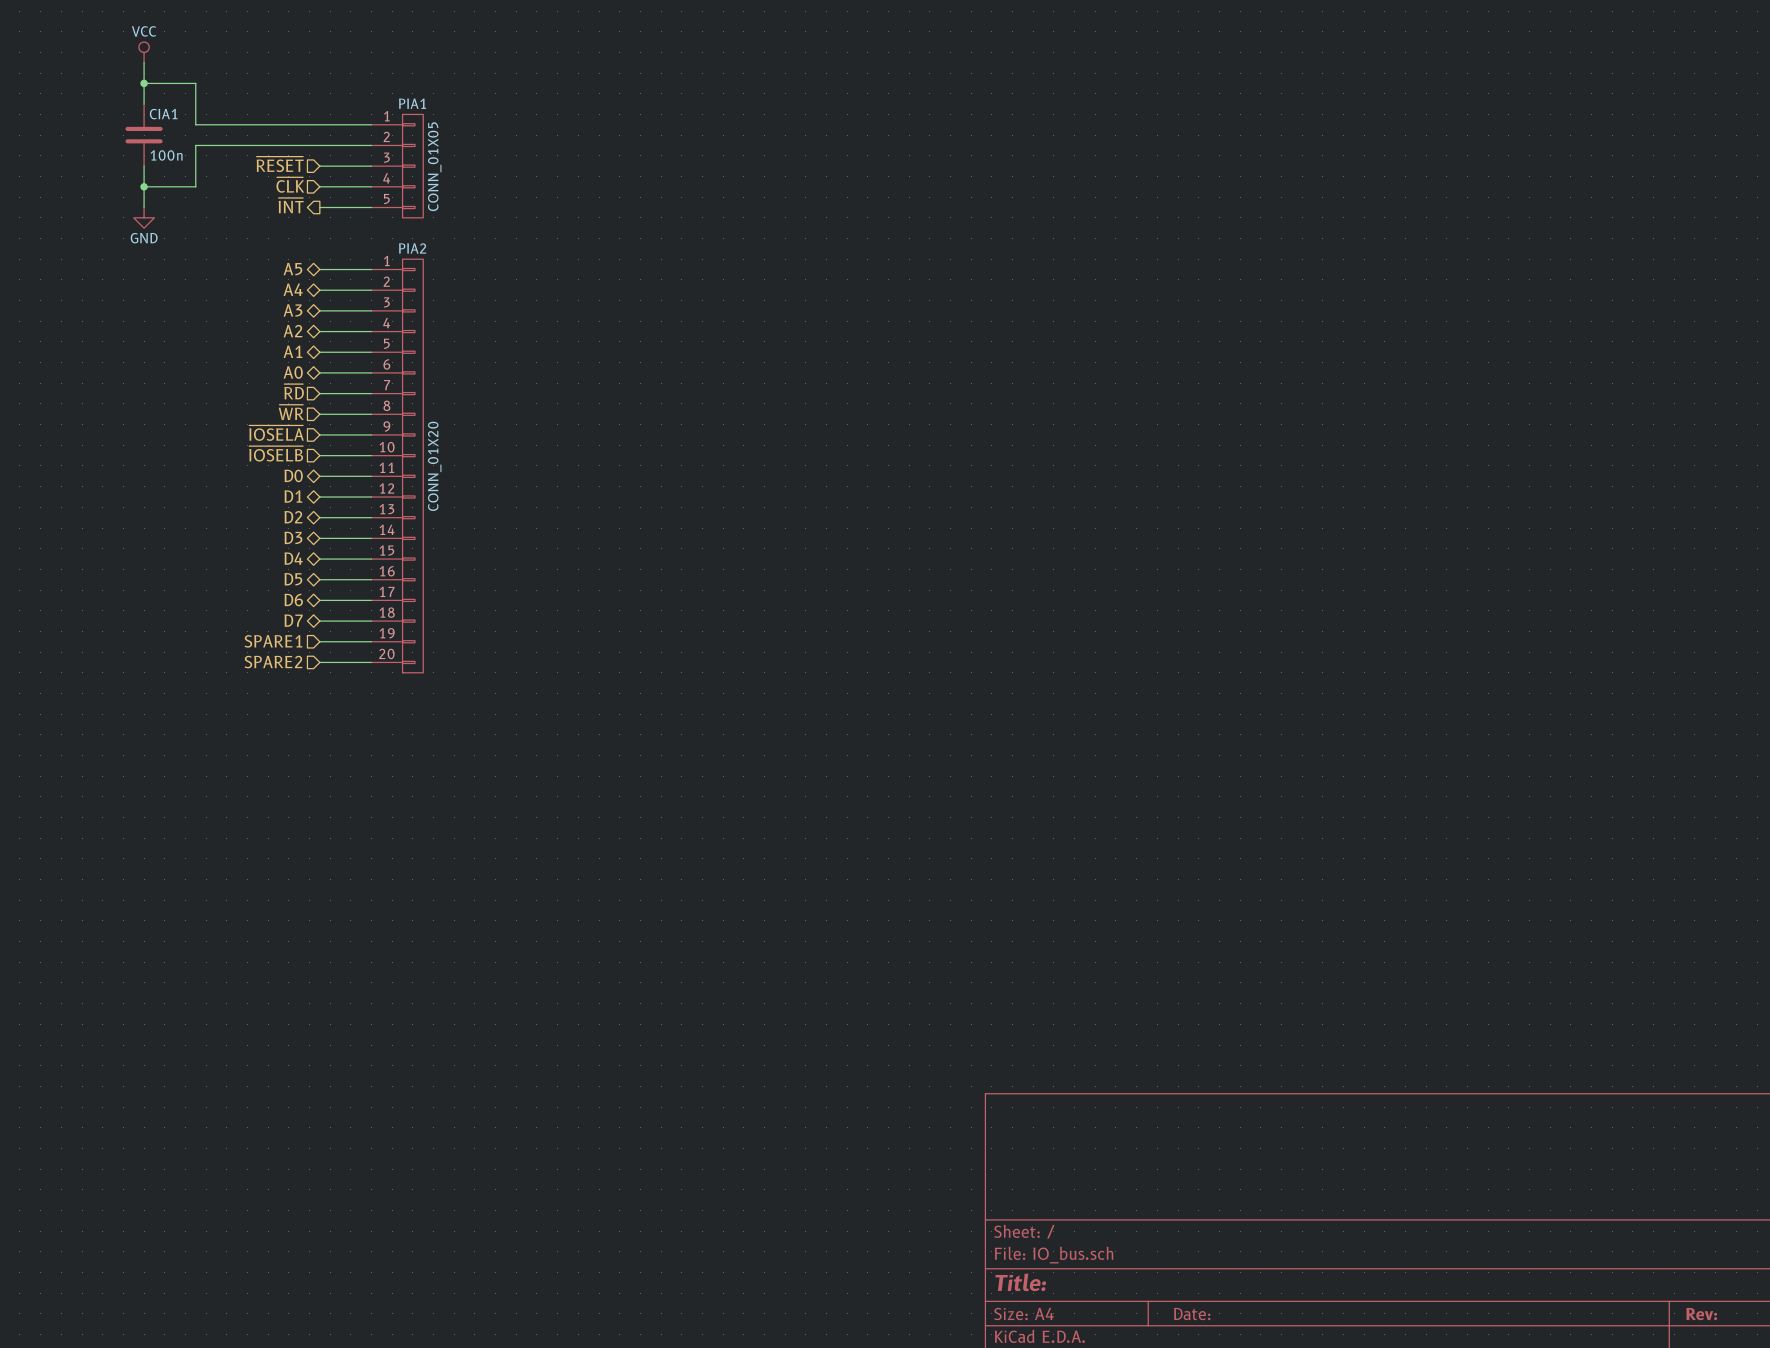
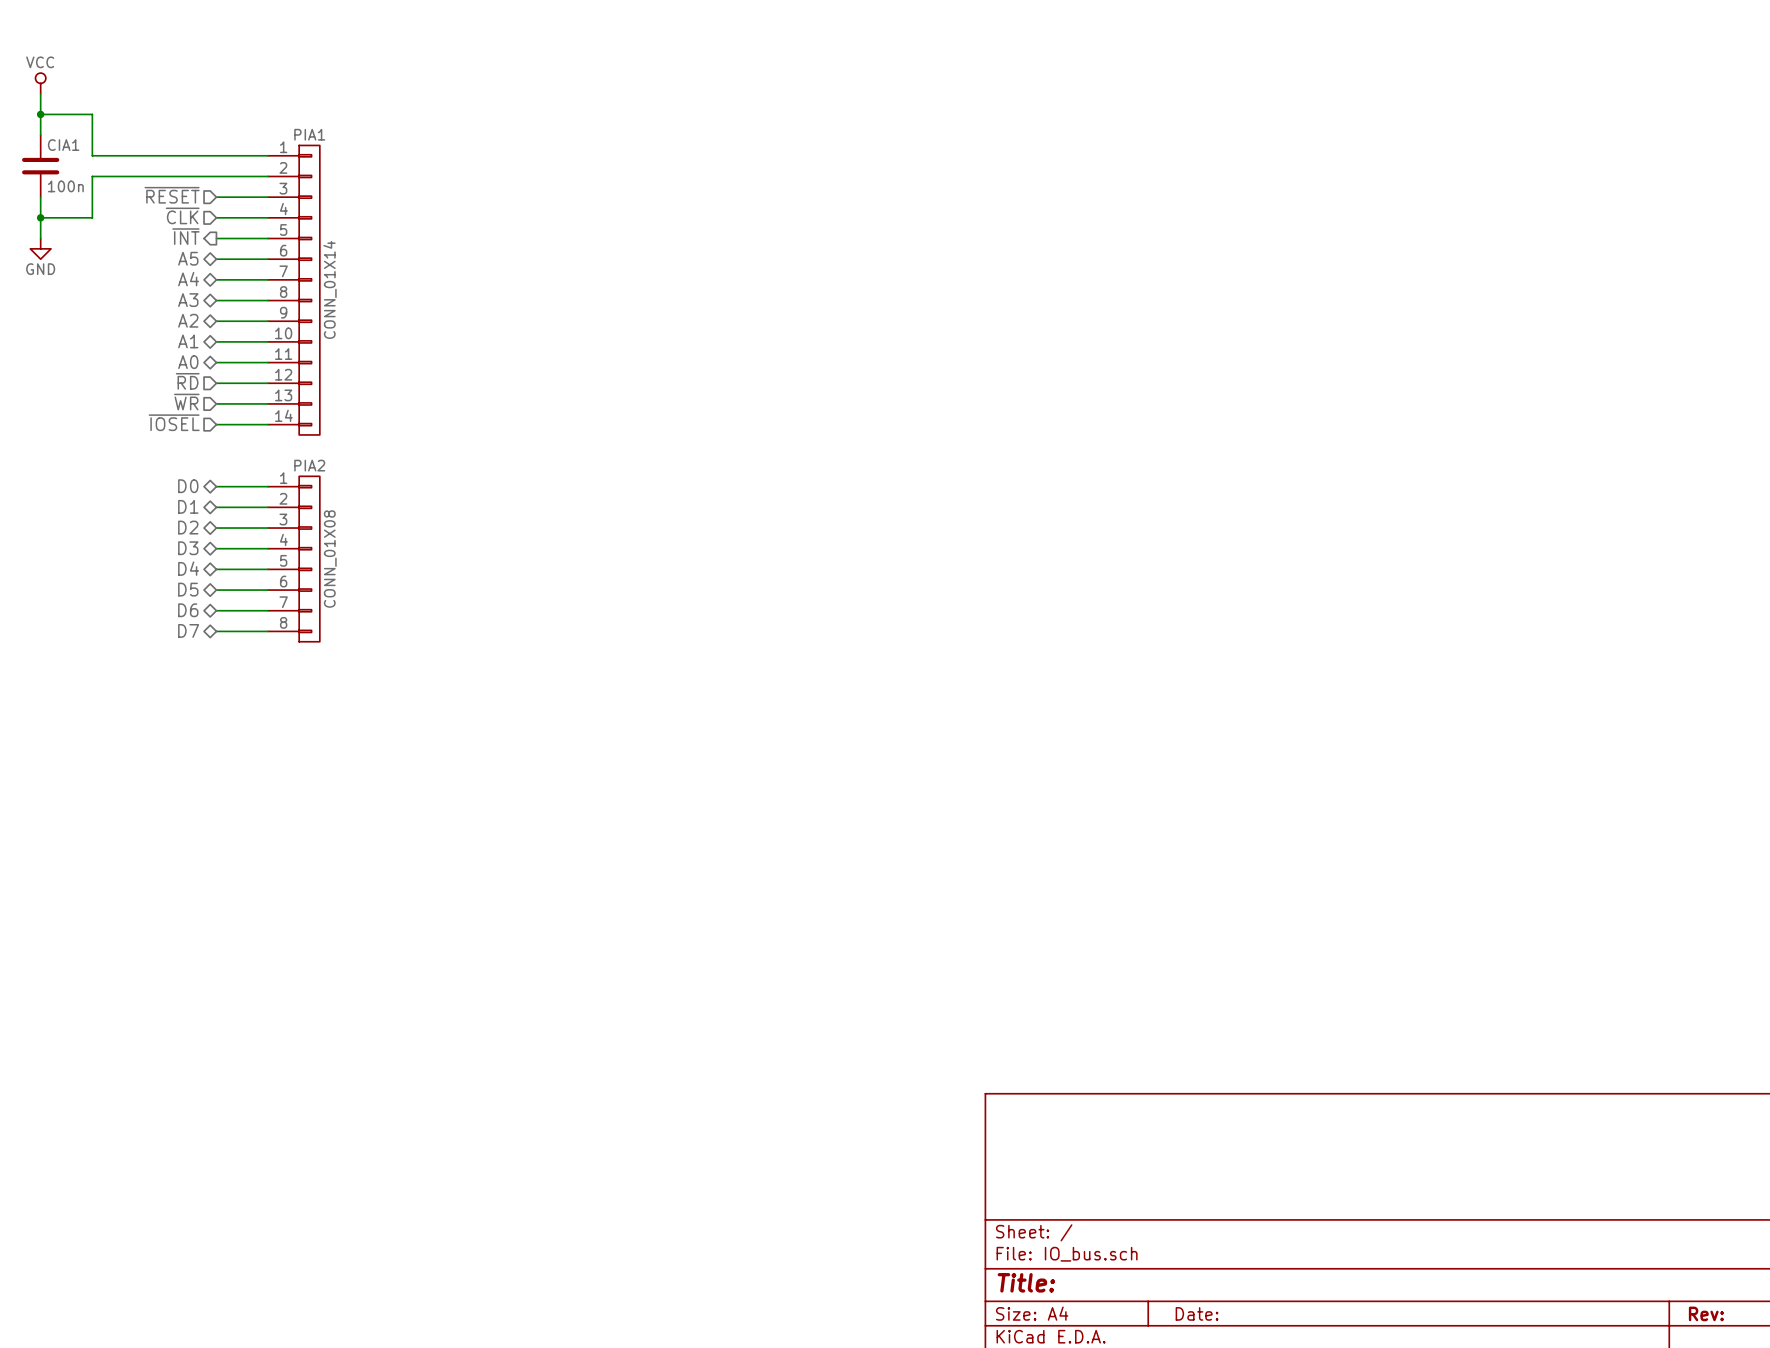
power symbol position: VCC (144, 52) -> VCC (40, 83)
wire: (144, 62) (144, 104) -> (40, 93) (40, 135)
wire: (144, 83) (195, 83) (195, 124) (371, 124) -> (40, 114) (92, 114) (92, 155) (268, 155)
junction: (144, 83) -> none
PIA1 name position: PIA1 (412, 103) -> PIA1 (309, 134)
junction: none -> (40, 114)
PIA1 symbol: [371, 114, 424, 218] -> [268, 145, 320, 435]
CIA1 position: (144, 135) -> (40, 166)
wire: (371, 145) (195, 145) (195, 186) (144, 186) -> (268, 176) (92, 176) (92, 217) (40, 217)
hierarchical label position: ~{RESET} (280, 164) -> ~{RESET} (172, 195)
wire: (144, 166) (144, 207) -> (40, 197) (40, 238)
wire: (319, 166) (371, 166) -> (216, 197) (268, 197)
PIA1 value: CONN_01X05 (434, 166) -> CONN_01X14 (330, 289)
hierarchical label position: ~{CLK} (290, 184) -> ~{CLK} (182, 215)
junction: (144, 186) -> none
wire: (319, 186) (371, 186) -> (216, 217) (268, 217)
hierarchical label position: ~{INT} (291, 205) -> ~{INT} (185, 236)
wire: (319, 207) (371, 207) -> (216, 238) (268, 238)
junction: none -> (40, 217)
power symbol position: GND (144, 217) -> GND (40, 248)
PIA2 name position: PIA2 (412, 248) -> PIA2 (309, 465)
wire: none -> (216, 259) (268, 259)
PIA2 symbol: [371, 259, 424, 673] -> [268, 476, 320, 642]
hierarchical label position: A5 (292, 269) -> A5 (188, 258)
wire: (319, 269) (371, 269) -> (216, 300) (268, 300)
hierarchical label position: A4 (293, 289) -> A4 (188, 279)
wire: (319, 290) (371, 290) -> (216, 321) (268, 321)
hierarchical label position: A3 (292, 310) -> A3 (188, 300)
wire: (319, 310) (371, 310) -> (216, 341) (268, 341)
hierarchical label position: A2 (292, 331) -> A2 (188, 320)
wire: (319, 331) (371, 331) -> (216, 362) (268, 362)
hierarchical label position: A1 (292, 351) -> A1 (188, 341)
wire: (319, 352) (371, 352) -> (216, 383) (268, 383)
hierarchical label position: A0 (293, 372) -> A0 (188, 362)
wire: (319, 372) (371, 372) -> (216, 403) (268, 403)
hierarchical label position: ~{RD} (294, 391) -> ~{RD} (187, 381)
wire: (319, 393) (371, 393) -> (216, 424) (268, 424)
hierarchical label position: ~{WR} (291, 412) -> ~{WR} (186, 402)
wire: (319, 414) (371, 414) -> (216, 279) (268, 279)
hierarchical label: ~{IOSELA} (276, 433) -> ~{IOSEL} (174, 422)
wire: (319, 434) (371, 434) -> none
hierarchical label: ~{IOSELB} (276, 453) -> none
wire: (319, 455) (371, 455) -> (216, 486) (268, 486)
PIA2 value: CONN_01X20 (434, 466) -> CONN_01X08 (330, 559)
hierarchical label position: D0 (293, 475) -> D0 (188, 486)
wire: (319, 476) (371, 476) -> (216, 507) (268, 507)
hierarchical label position: D1 (293, 496) -> D1 (188, 506)
wire: (319, 497) (371, 497) -> (216, 528) (268, 528)
hierarchical label position: D2 (293, 517) -> D2 (188, 527)
wire: (319, 517) (371, 517) -> (216, 548) (268, 548)
hierarchical label position: D3 (293, 537) -> D3 (188, 548)
wire: (319, 538) (371, 538) -> (216, 569) (268, 569)
hierarchical label position: D4 (293, 558) -> D4 (188, 568)
wire: (319, 559) (371, 559) -> (216, 590) (268, 590)
hierarchical label position: D5 (293, 579) -> D5 (188, 589)
wire: (319, 579) (371, 579) -> (216, 610) (268, 610)
hierarchical label position: D6 (293, 600) -> D6 (188, 610)
wire: (319, 600) (371, 600) -> (216, 631) (268, 631)
hierarchical label position: D7 (293, 620) -> D7 (188, 630)
wire: (319, 621) (371, 621) -> none
hierarchical label: SPARE1 (273, 641) -> none
wire: (319, 641) (371, 641) -> none
hierarchical label: SPARE2 (273, 662) -> none
wire: (319, 662) (371, 662) -> none

